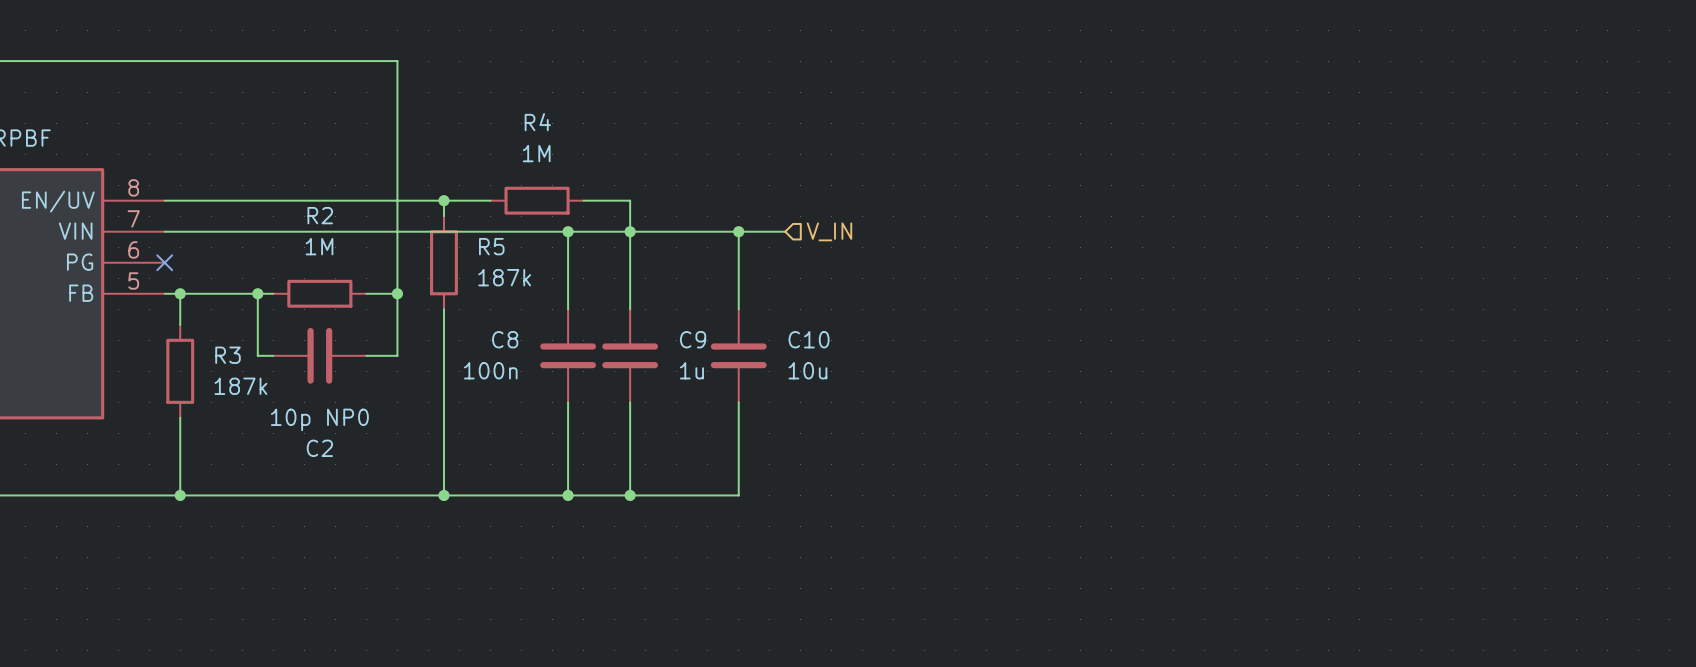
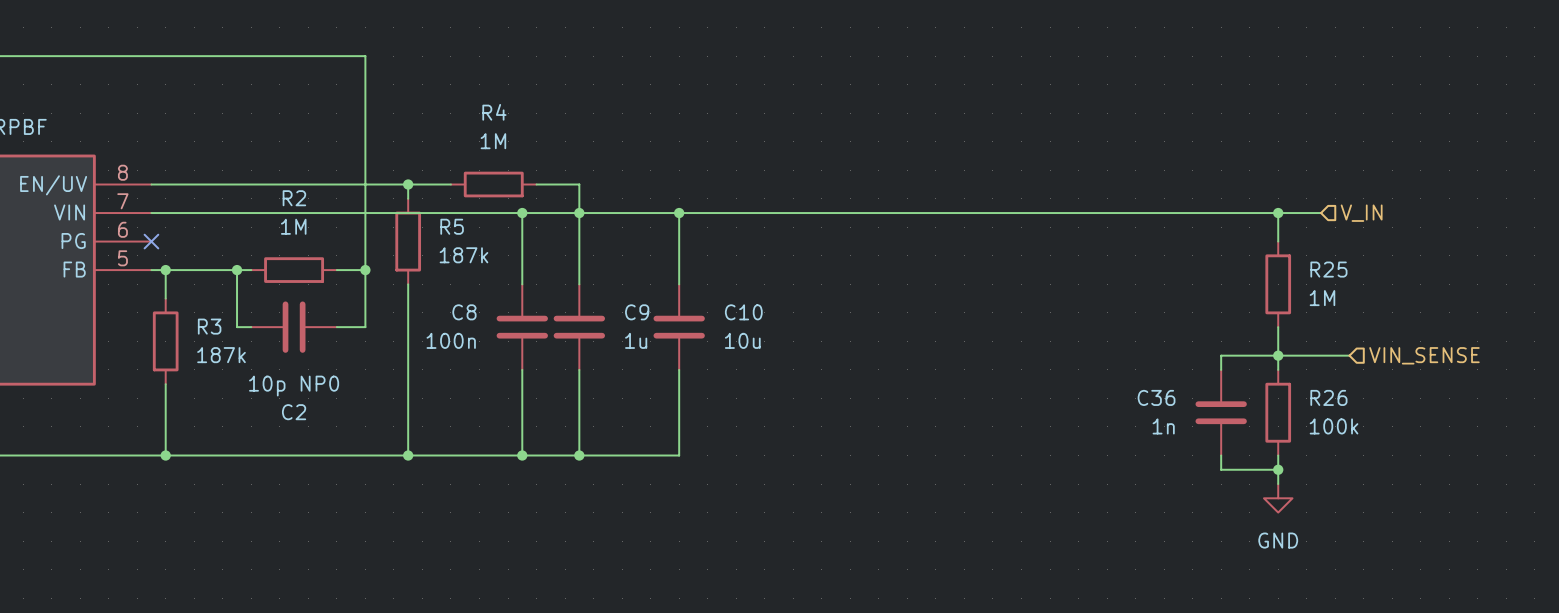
wire: none -> (721, 213) (1321, 213)
hierarchical label: V_IN (829, 231) -> none
wire: none -> (1278, 213) (1278, 241)
junction: none -> (1278, 213)
hierarchical label: none -> V_IN (1361, 213)
R25: none -> 1M (1278, 284)
wire: none -> (1278, 327) (1278, 369)
junction: none -> (1278, 355)
wire: none -> (1349, 355) (1221, 355) (1221, 369)
hierarchical label: none -> VIN_SENSE (1424, 355)
C36: none -> 1n (1221, 412)
R26: none -> 100k (1278, 412)
wire: none -> (1221, 455) (1221, 469) (1278, 469)
wire: none -> (1278, 455) (1278, 484)
junction: none -> (1278, 469)
power symbol: none -> GND (1278, 498)

